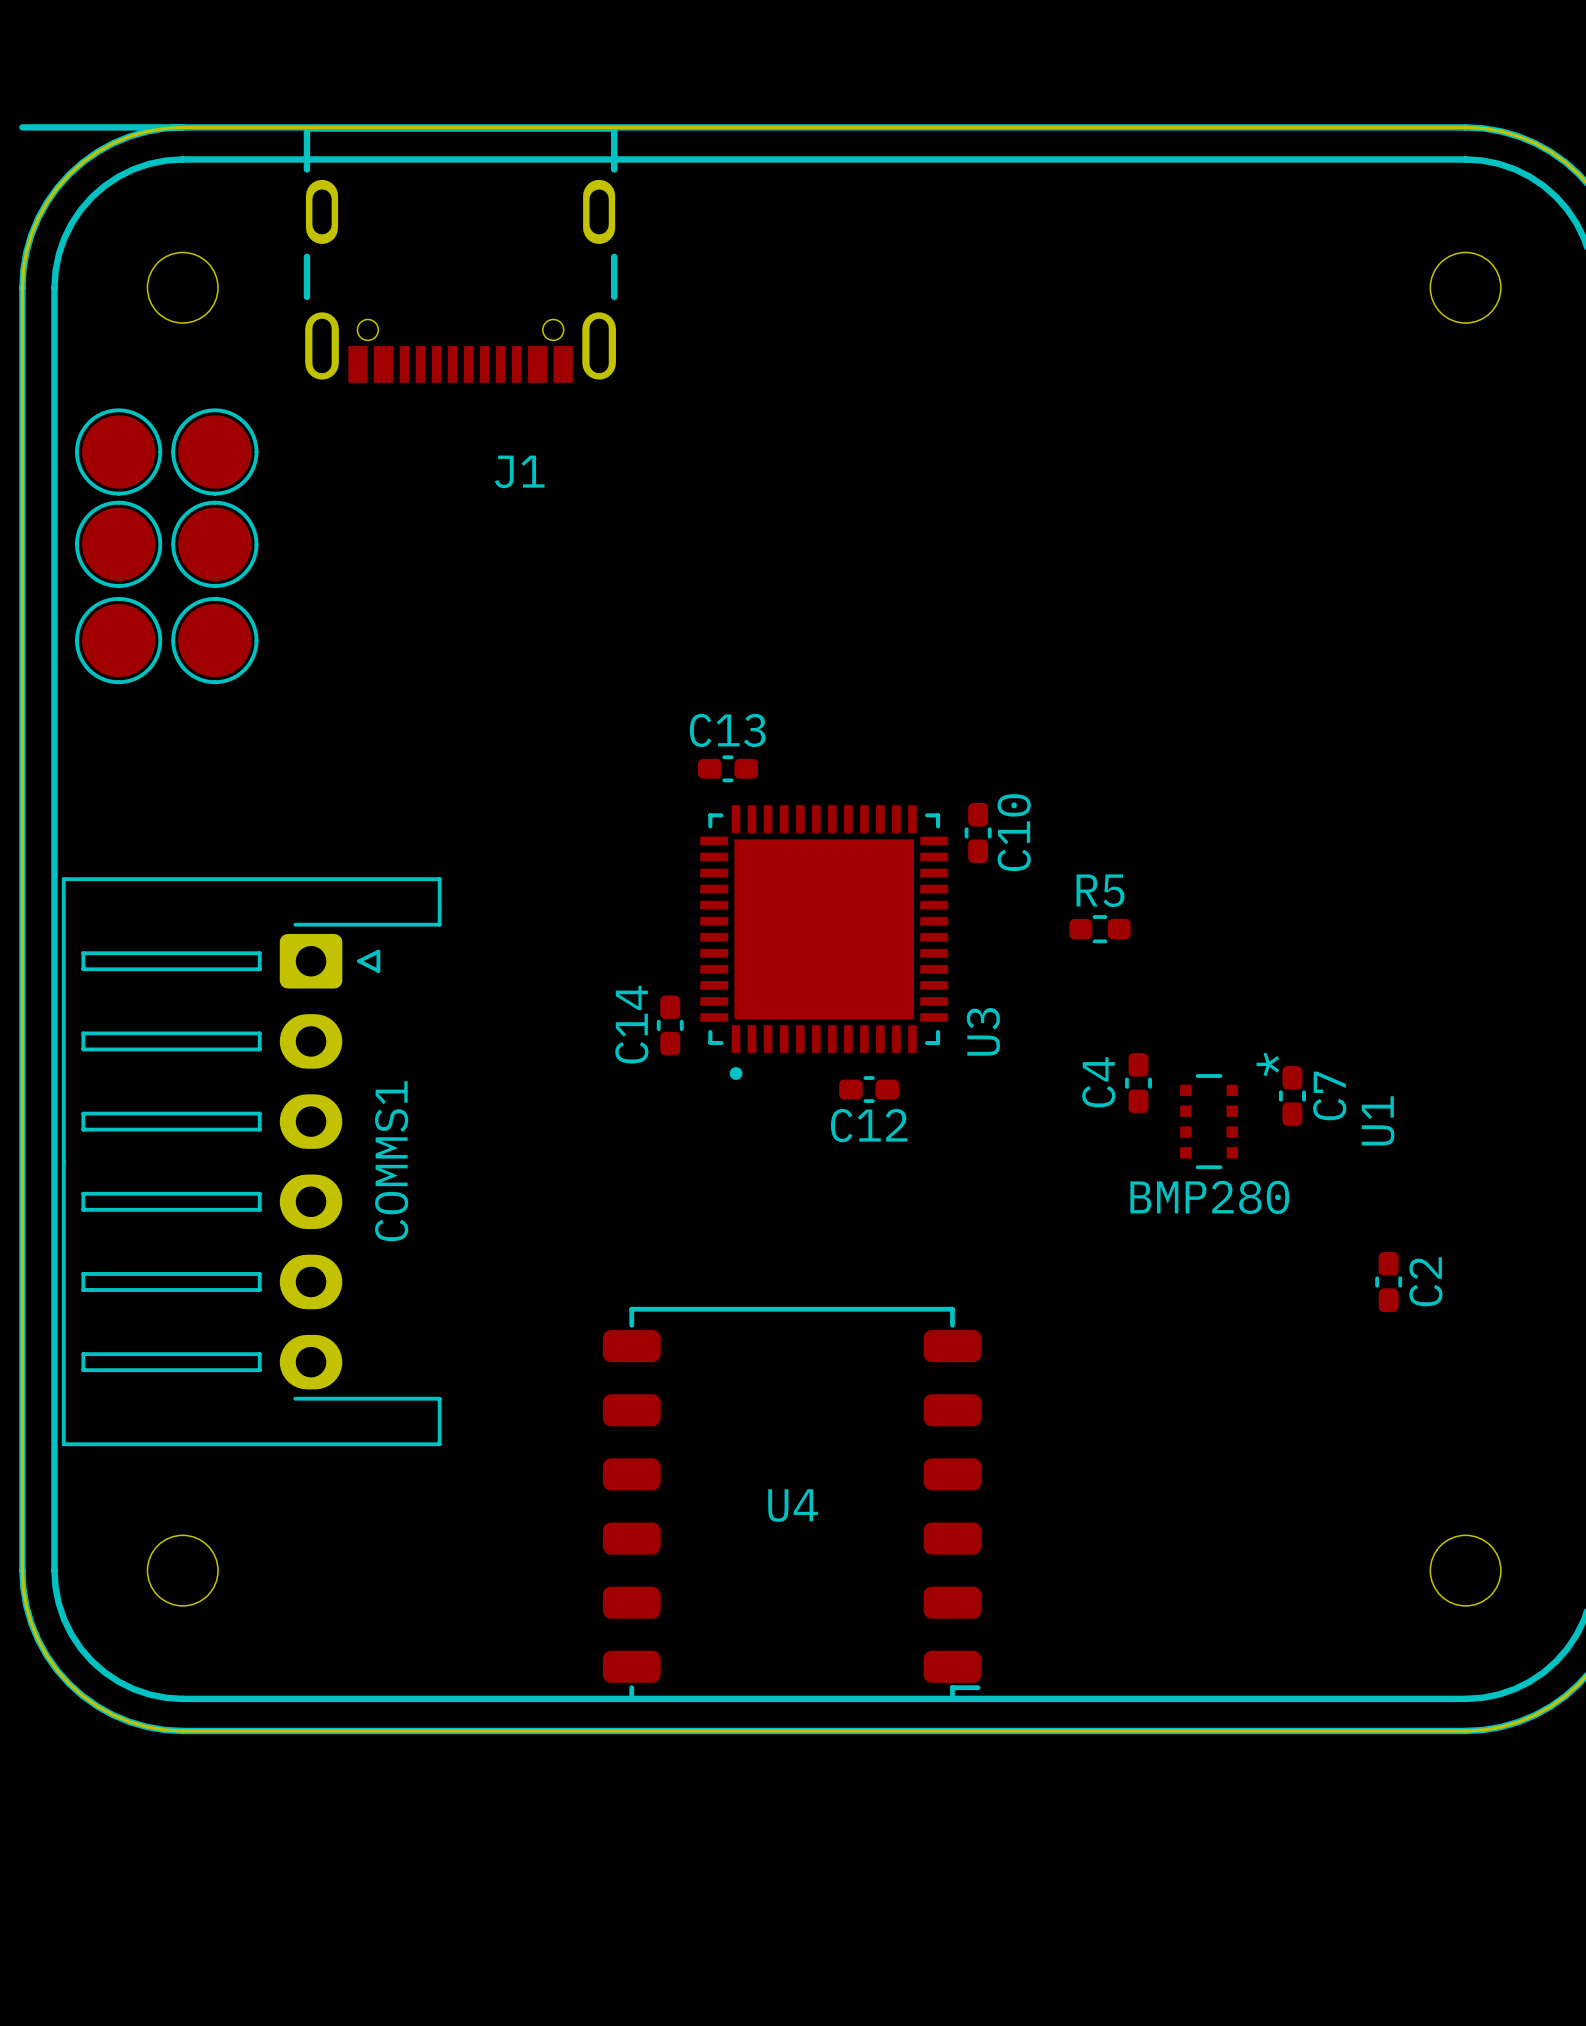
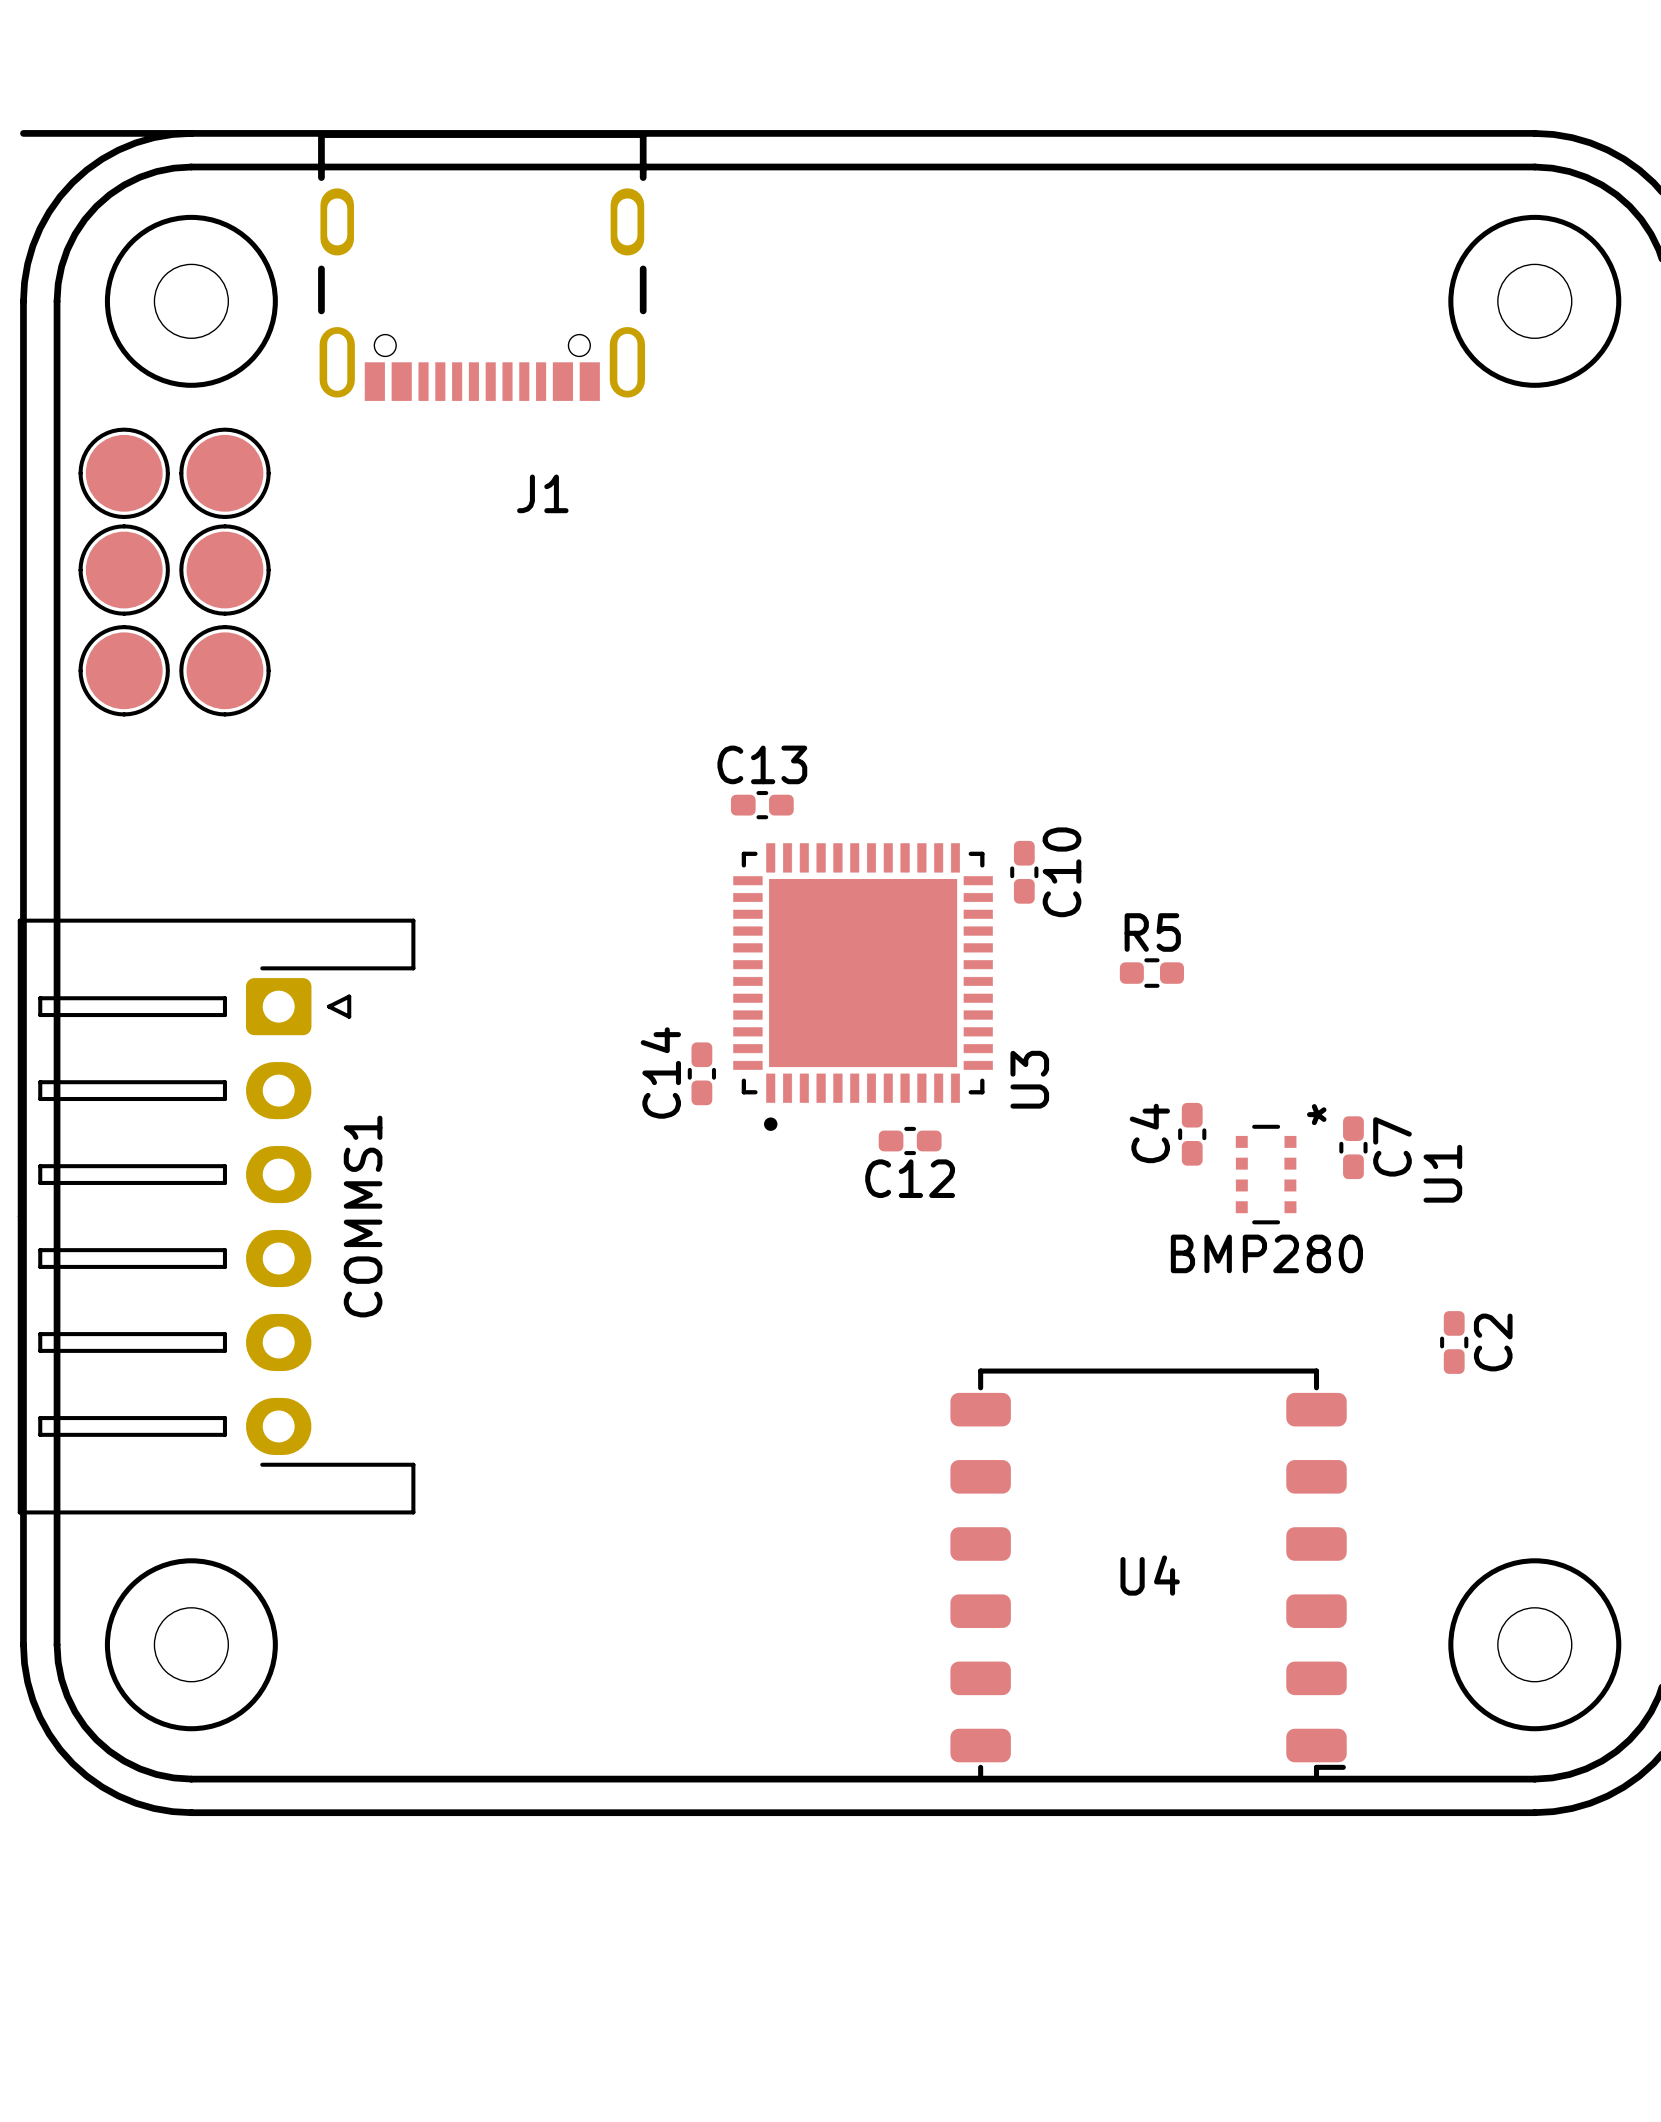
drawing: none -> [104, 214, 278, 388]
drawing: none -> [1448, 214, 1622, 388]
COMMS1 position: (251, 1161) -> (216, 1216)
drawing: none -> [104, 1558, 278, 1732]
drawing: none -> [1448, 1558, 1622, 1732]
U4 position: (792, 1504) -> (1148, 1575)

